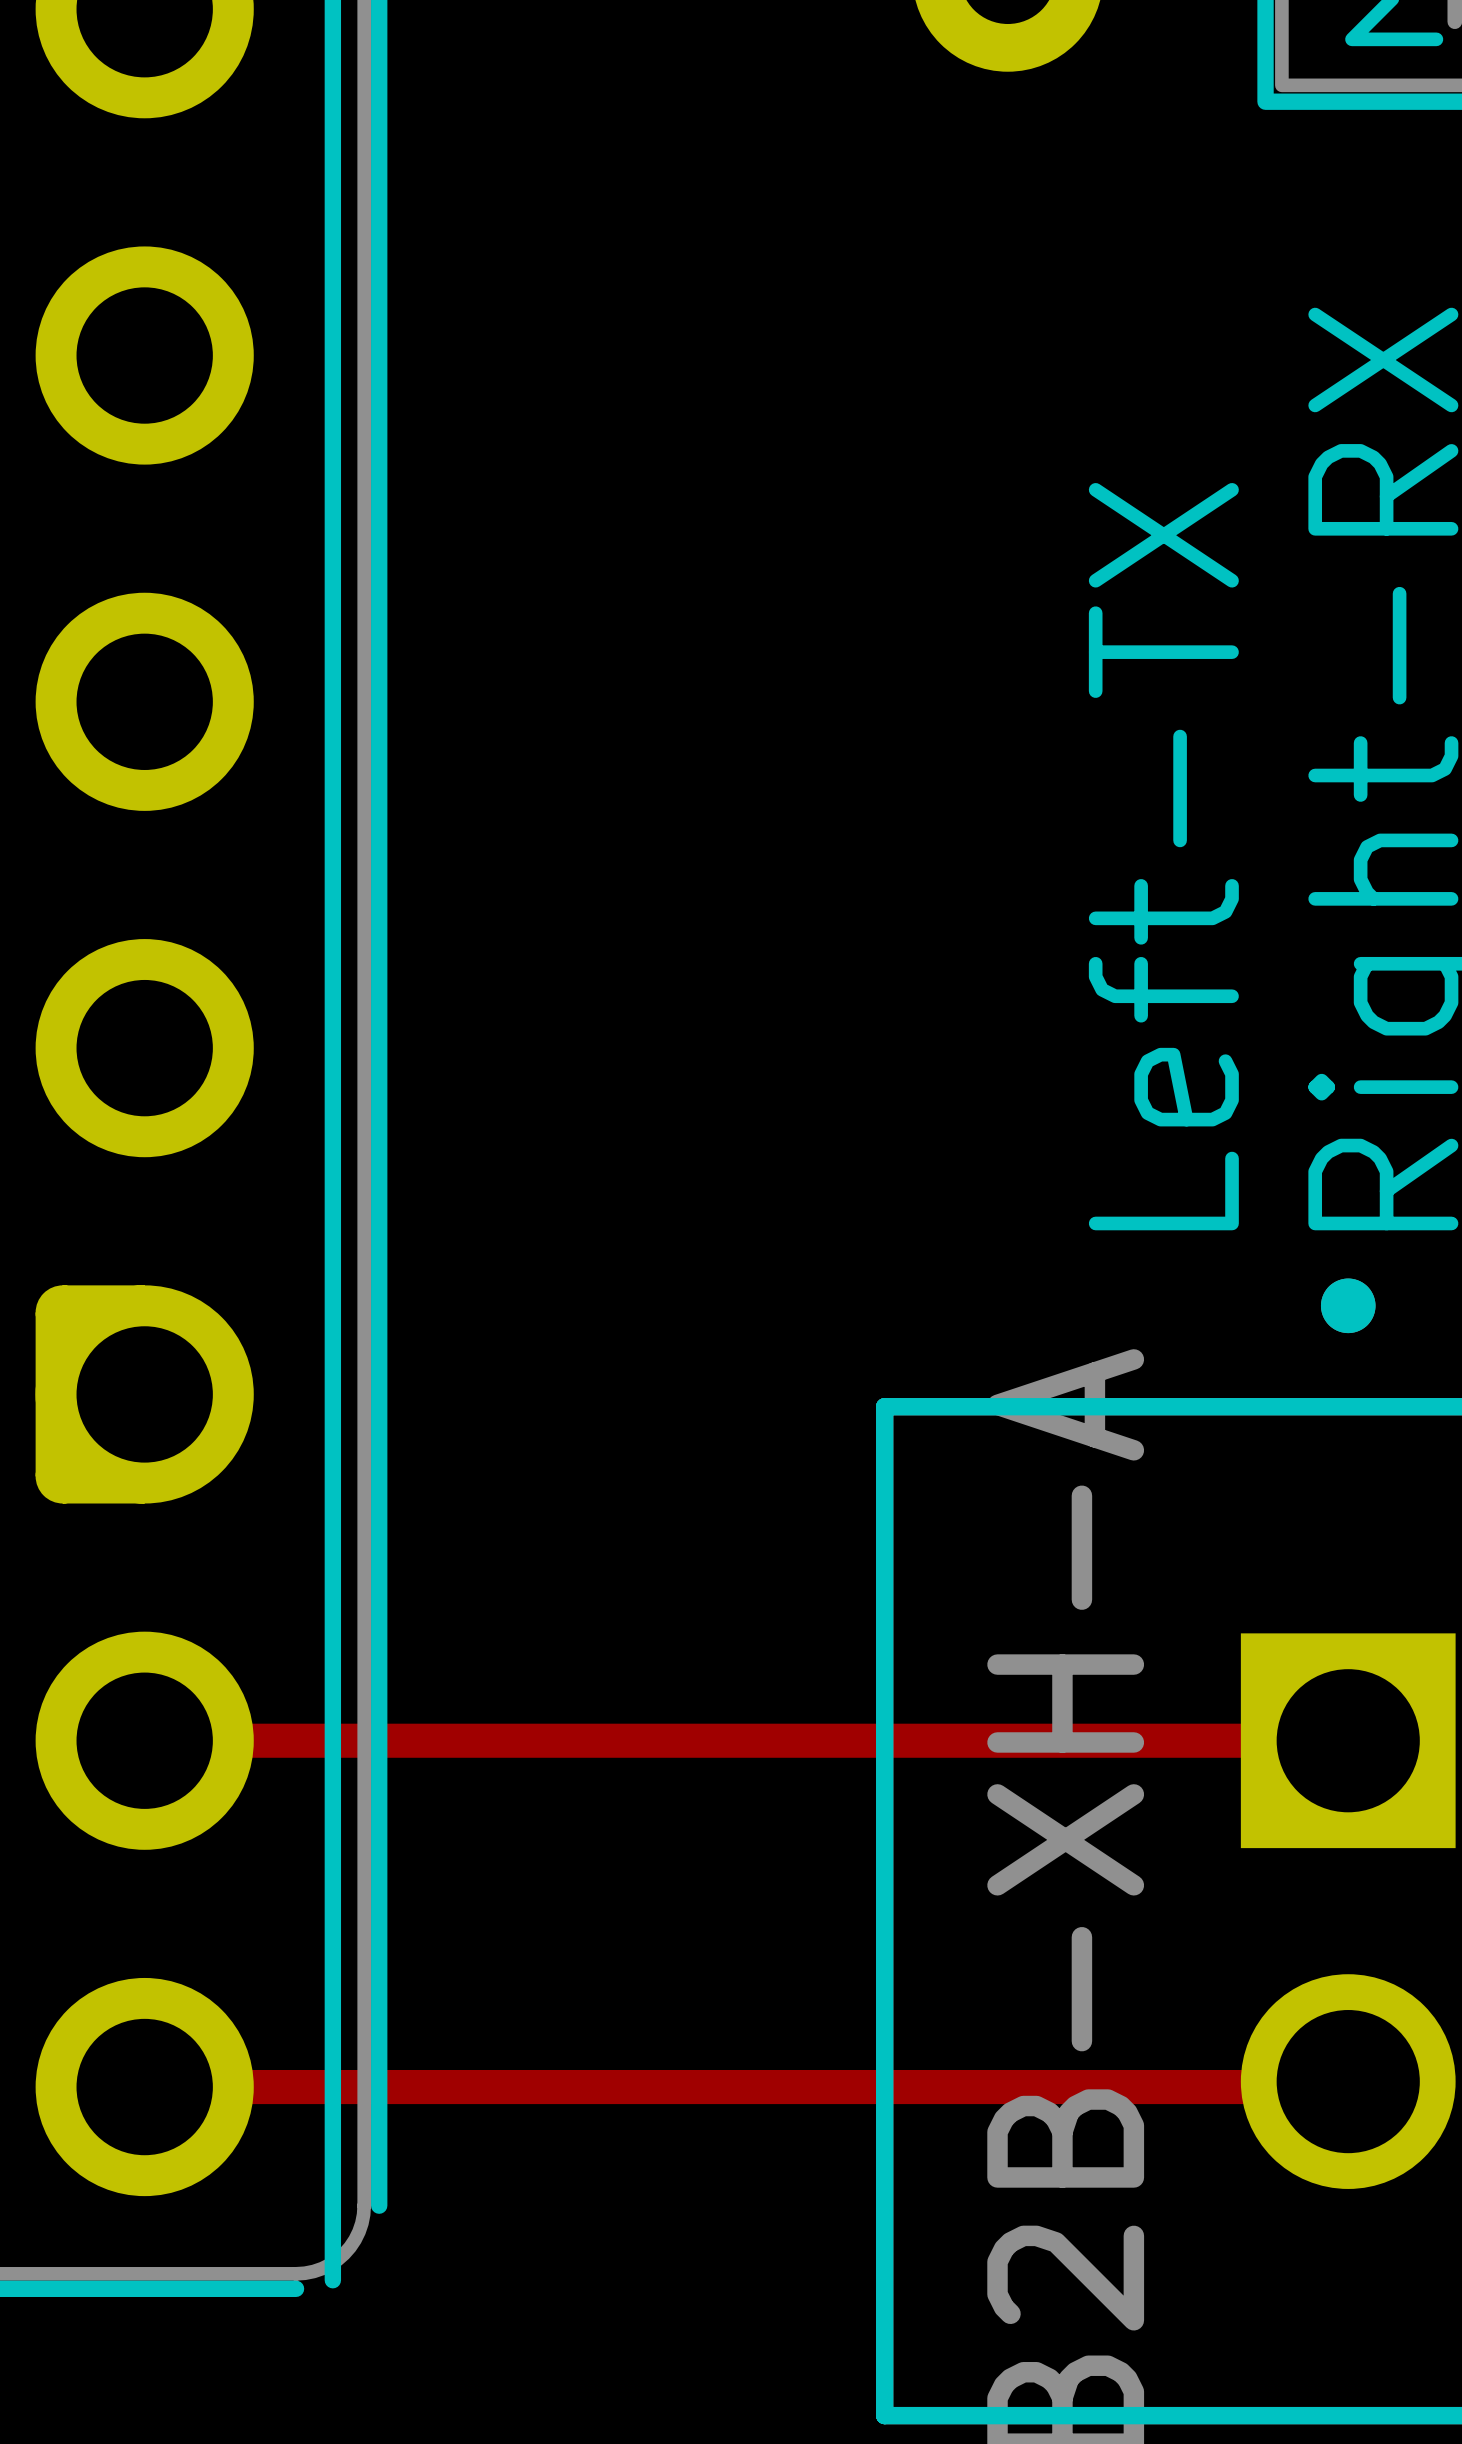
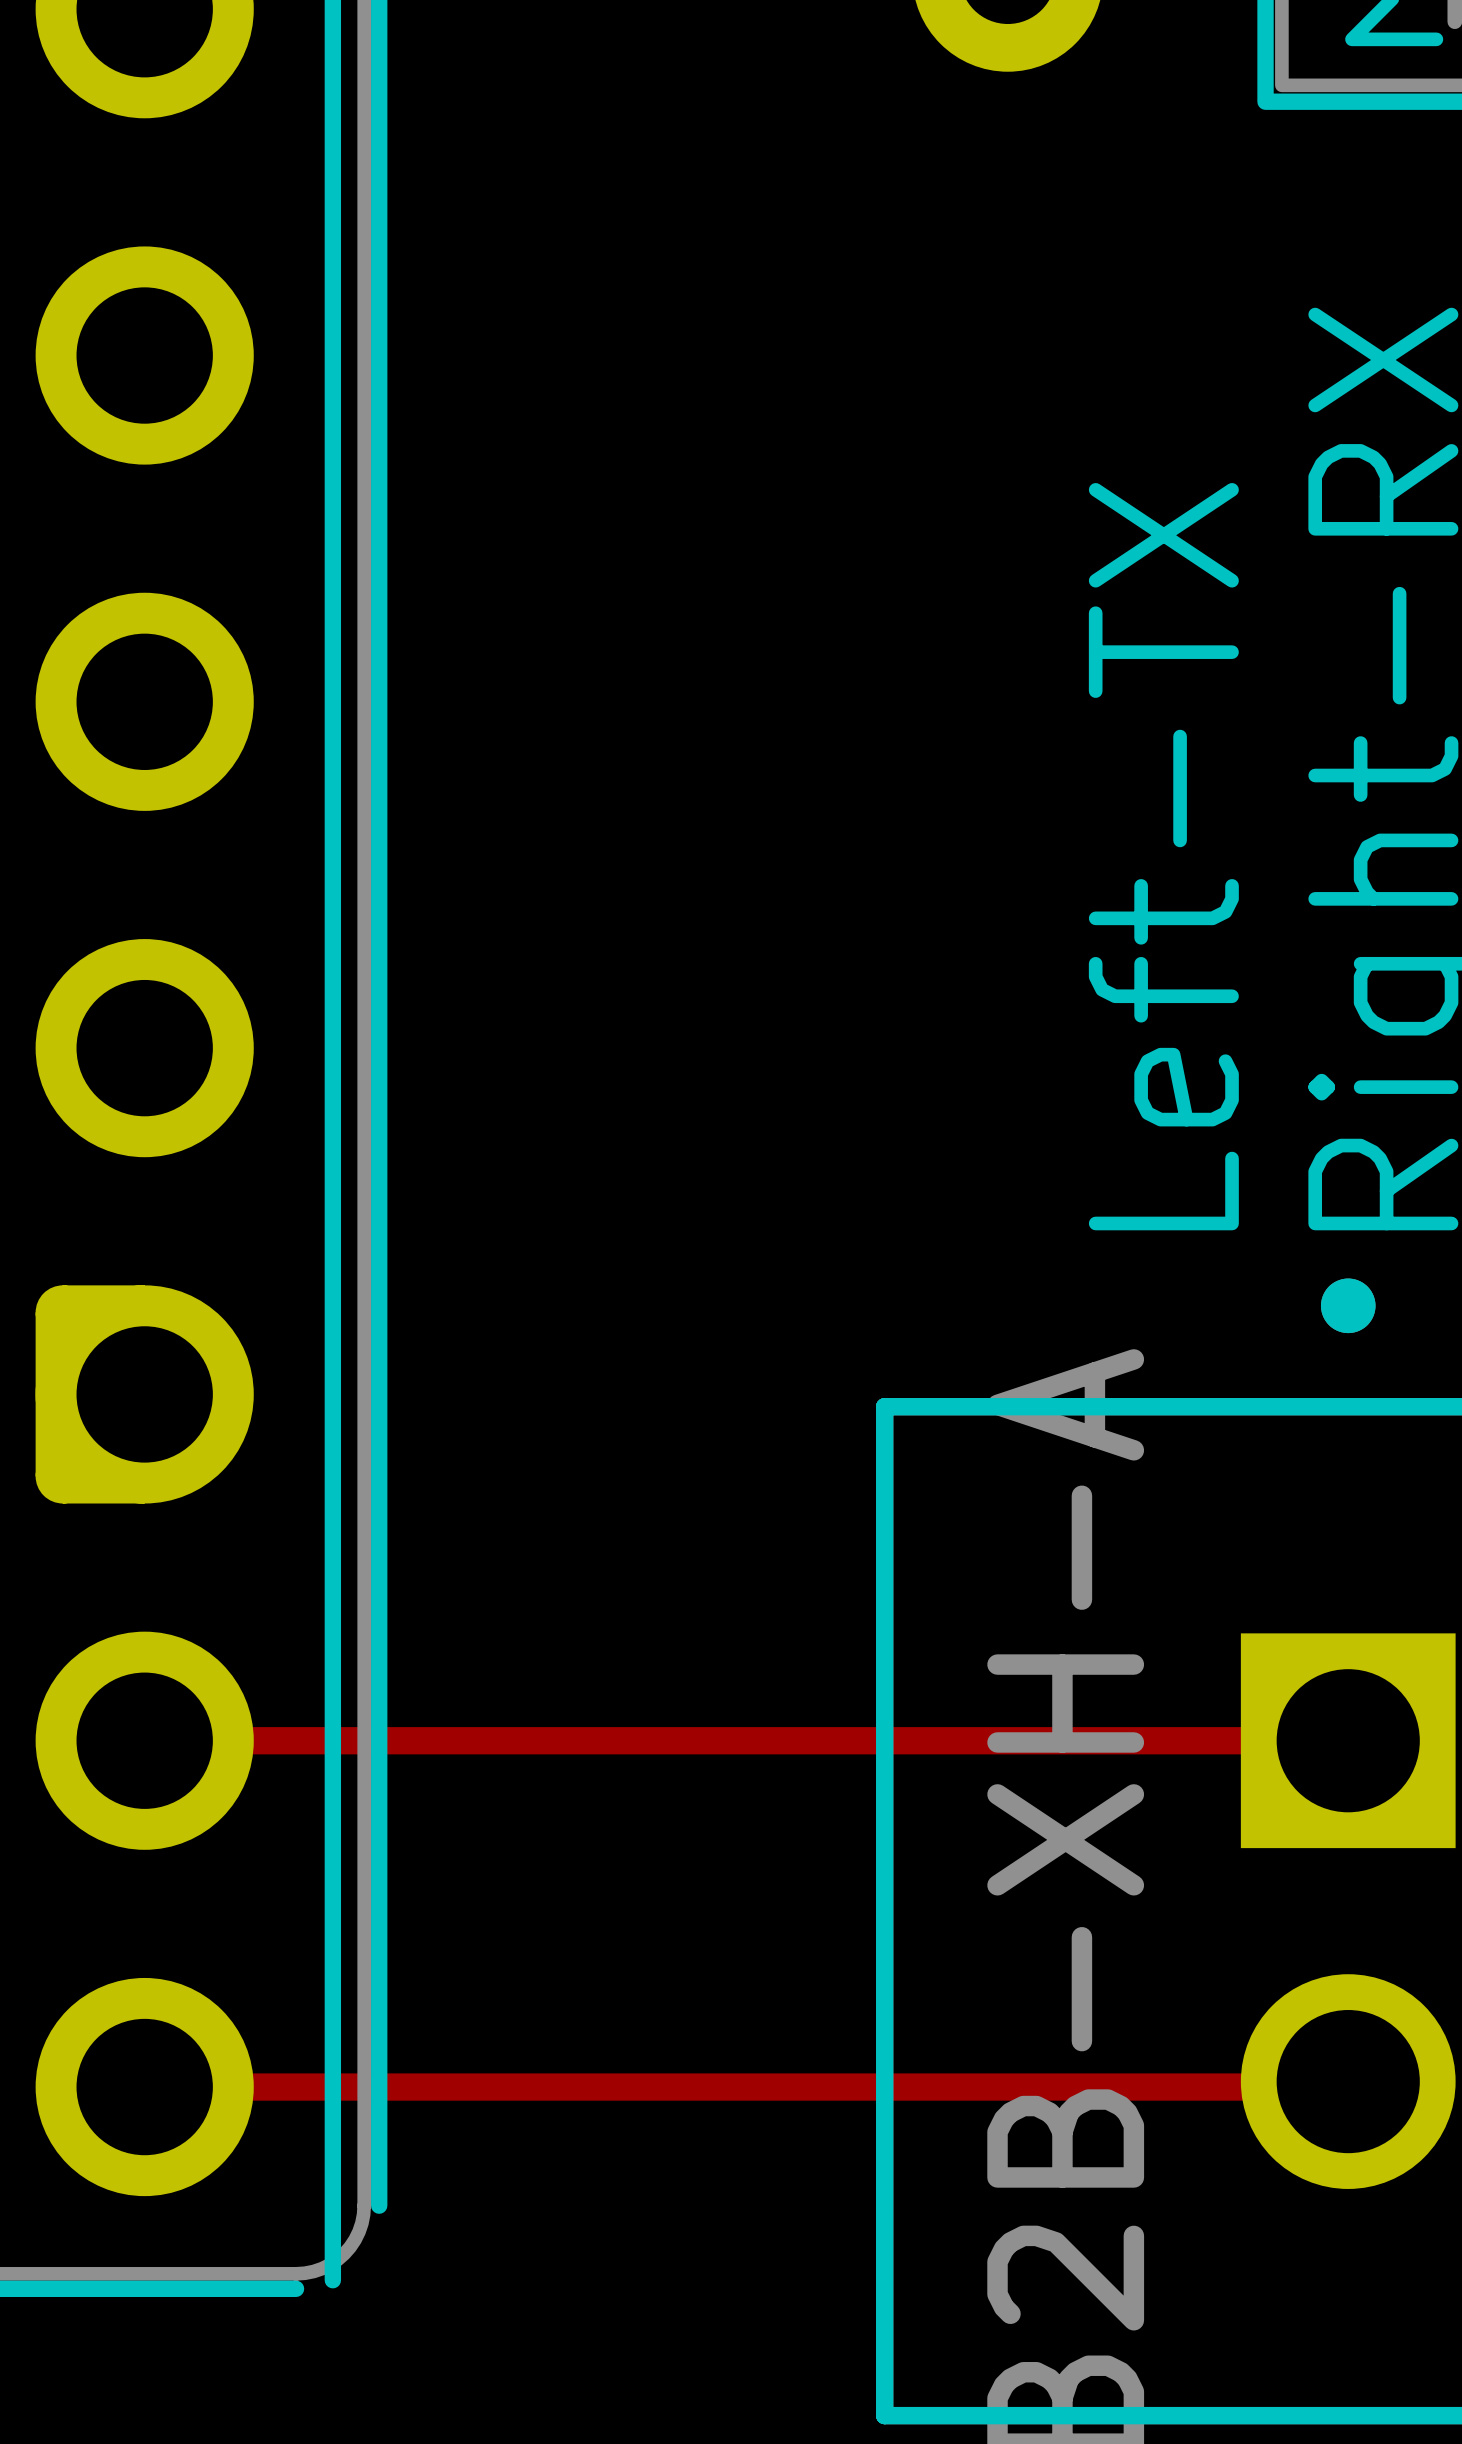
top track width: thick (144, 1740) (1348, 1740) -> thin (144, 1740) (1348, 1740)
top track width: thick (1348, 2081) (1342, 2087) (144, 2087) -> thin (1348, 2081) (1342, 2087) (144, 2087)

